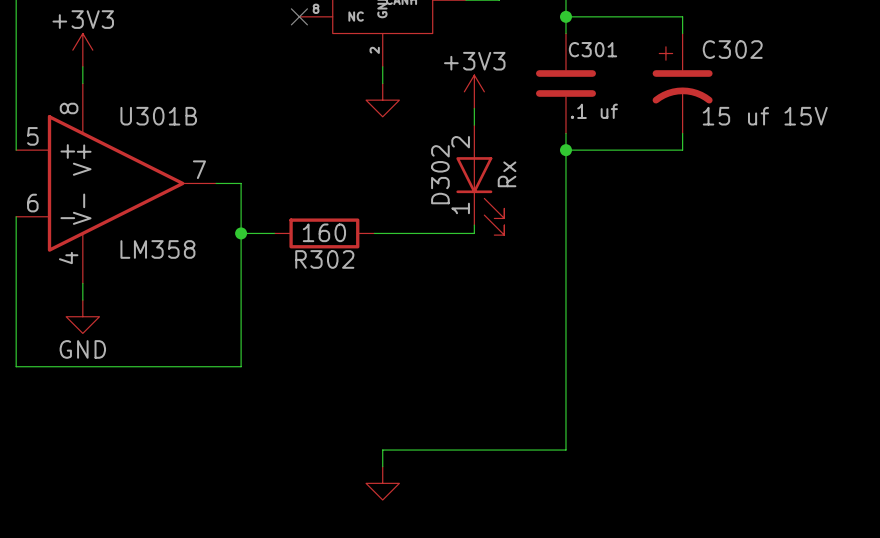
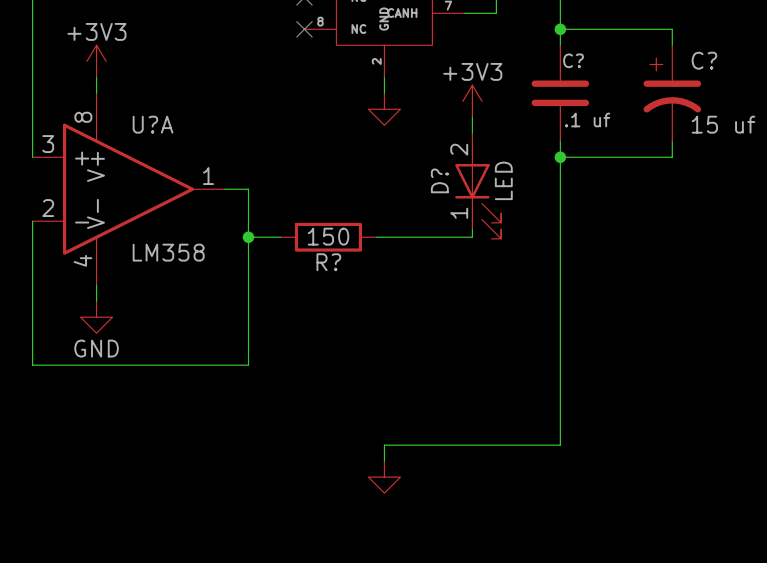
C301 name: C301 (593, 49) -> C? (573, 60)
C302 name: C302 (732, 49) -> C? (704, 60)
U301B name: U301B (158, 116) -> U?A (153, 124)
U301B pin number: 5 (32, 136) -> 3 (48, 144)
U301B pin number: 7 (199, 169) -> 1 (208, 176)
D302 name: D302 (440, 174) -> D? (439, 180)
D302 value: Rx (507, 174) -> LED (503, 180)
U301B pin number: 6 (32, 203) -> 2 (48, 208)
R302 value: 160 (324, 232) -> 150 (328, 236)
R302 name: R302 (324, 259) -> R? (328, 262)

